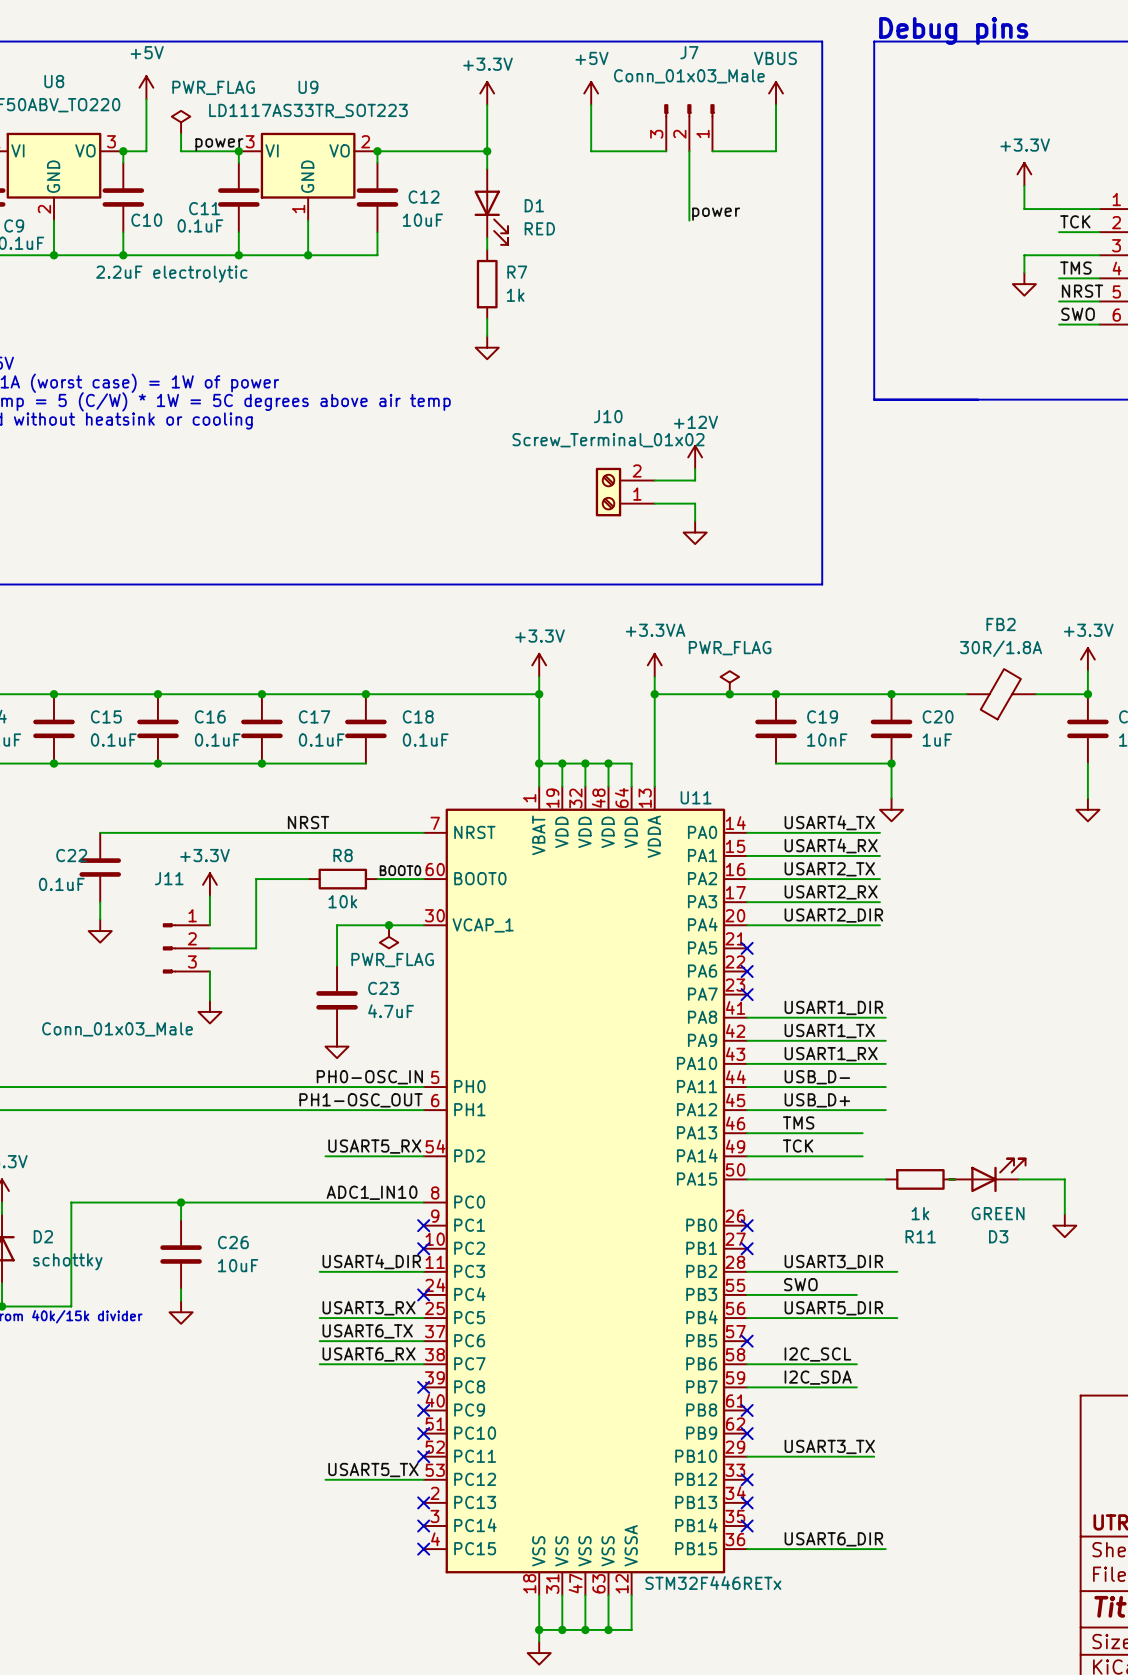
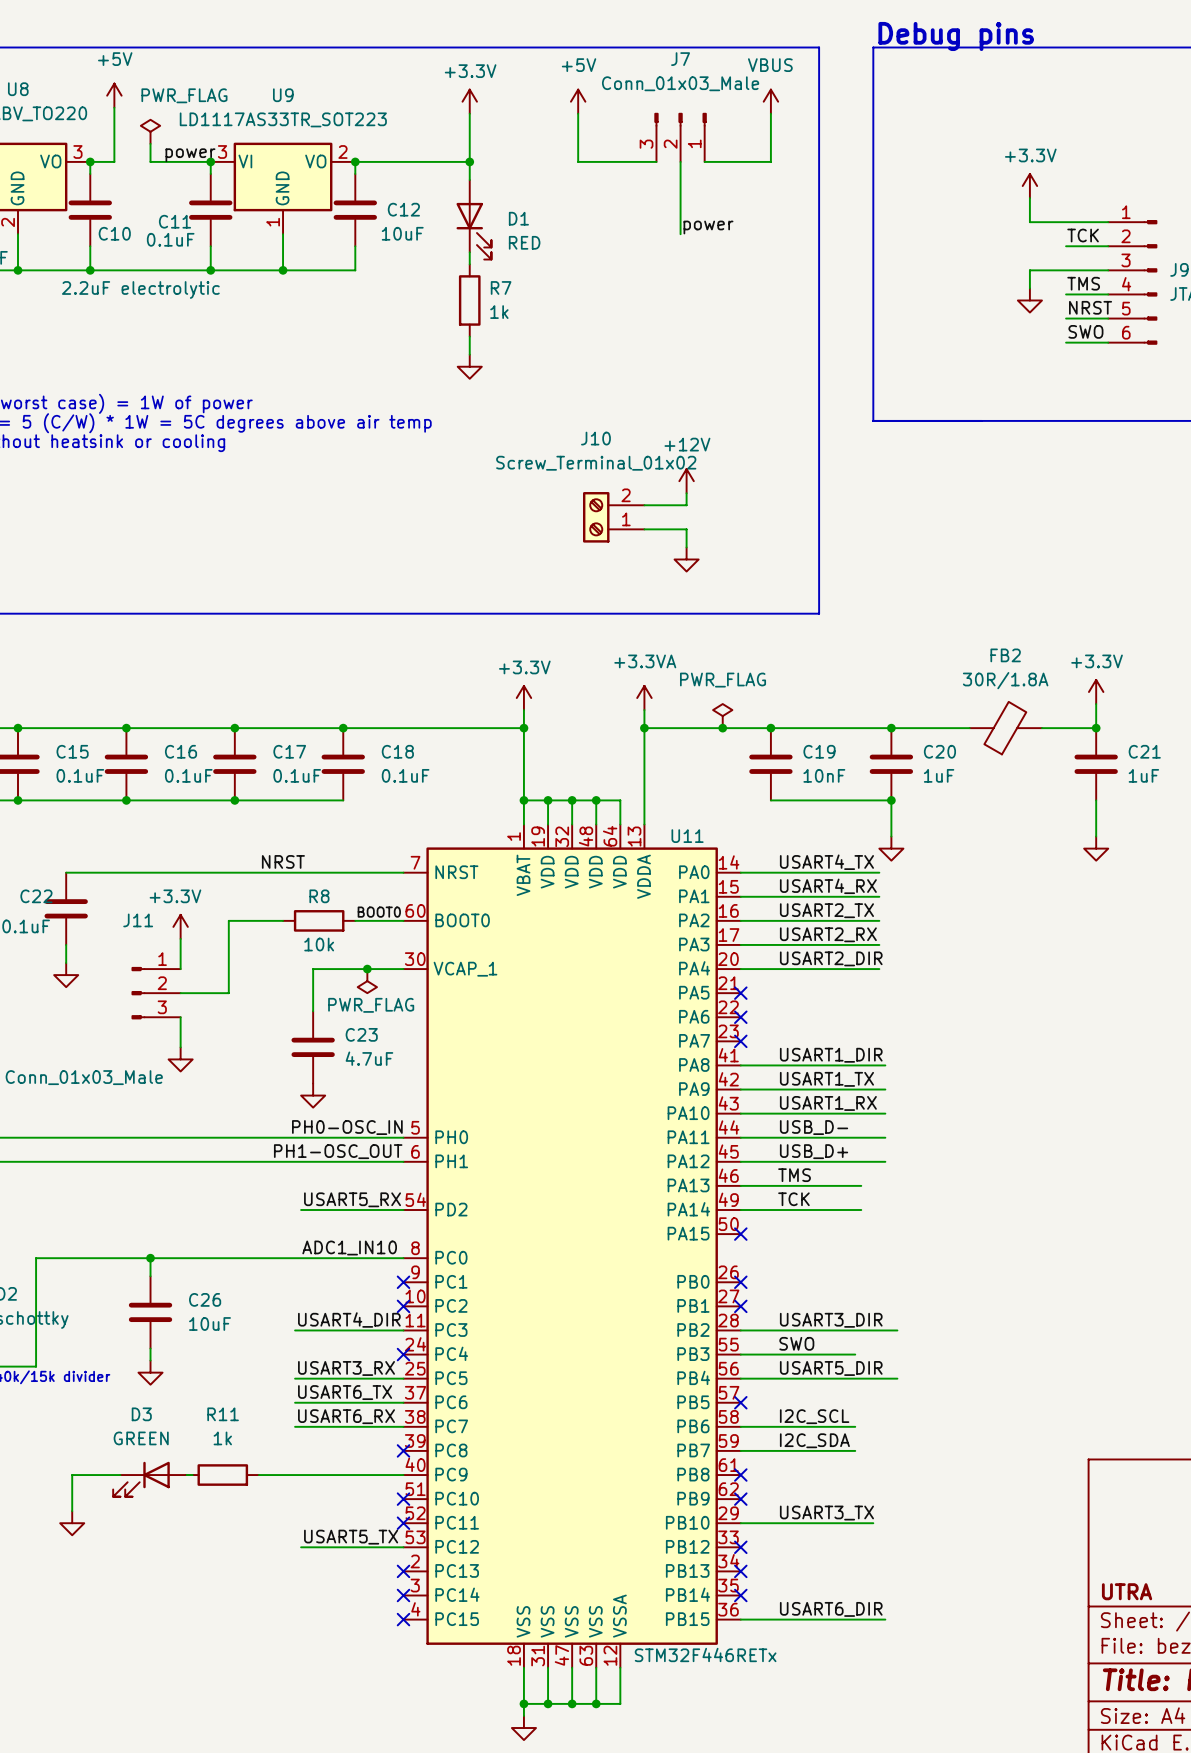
D3 position: (987, 1175) -> (152, 1479)
D3 rotation: 0° (998, 1175) -> 180° (141, 1479)
wire: (747, 1179) (885, 1179) -> none
no-connect mark: none -> (740, 1234)
R11 position: (920, 1179) -> (222, 1475)
wire: (949, 1179) (955, 1179) -> none
wire: (1018, 1179) (1064, 1179) (1064, 1214) -> none
R11 value position: 1k (920, 1213) -> 1k (222, 1438)
power symbol: (1064, 1225) -> none
R11 name position: R11 (920, 1236) -> R11 (223, 1414)
wire: none -> (120, 1475) (72, 1475) (72, 1511)
wire: none -> (186, 1475) (192, 1475)
wire: none -> (258, 1475) (403, 1475)
no-connect mark: (423, 1410) -> none
power symbol: none -> (72, 1523)

